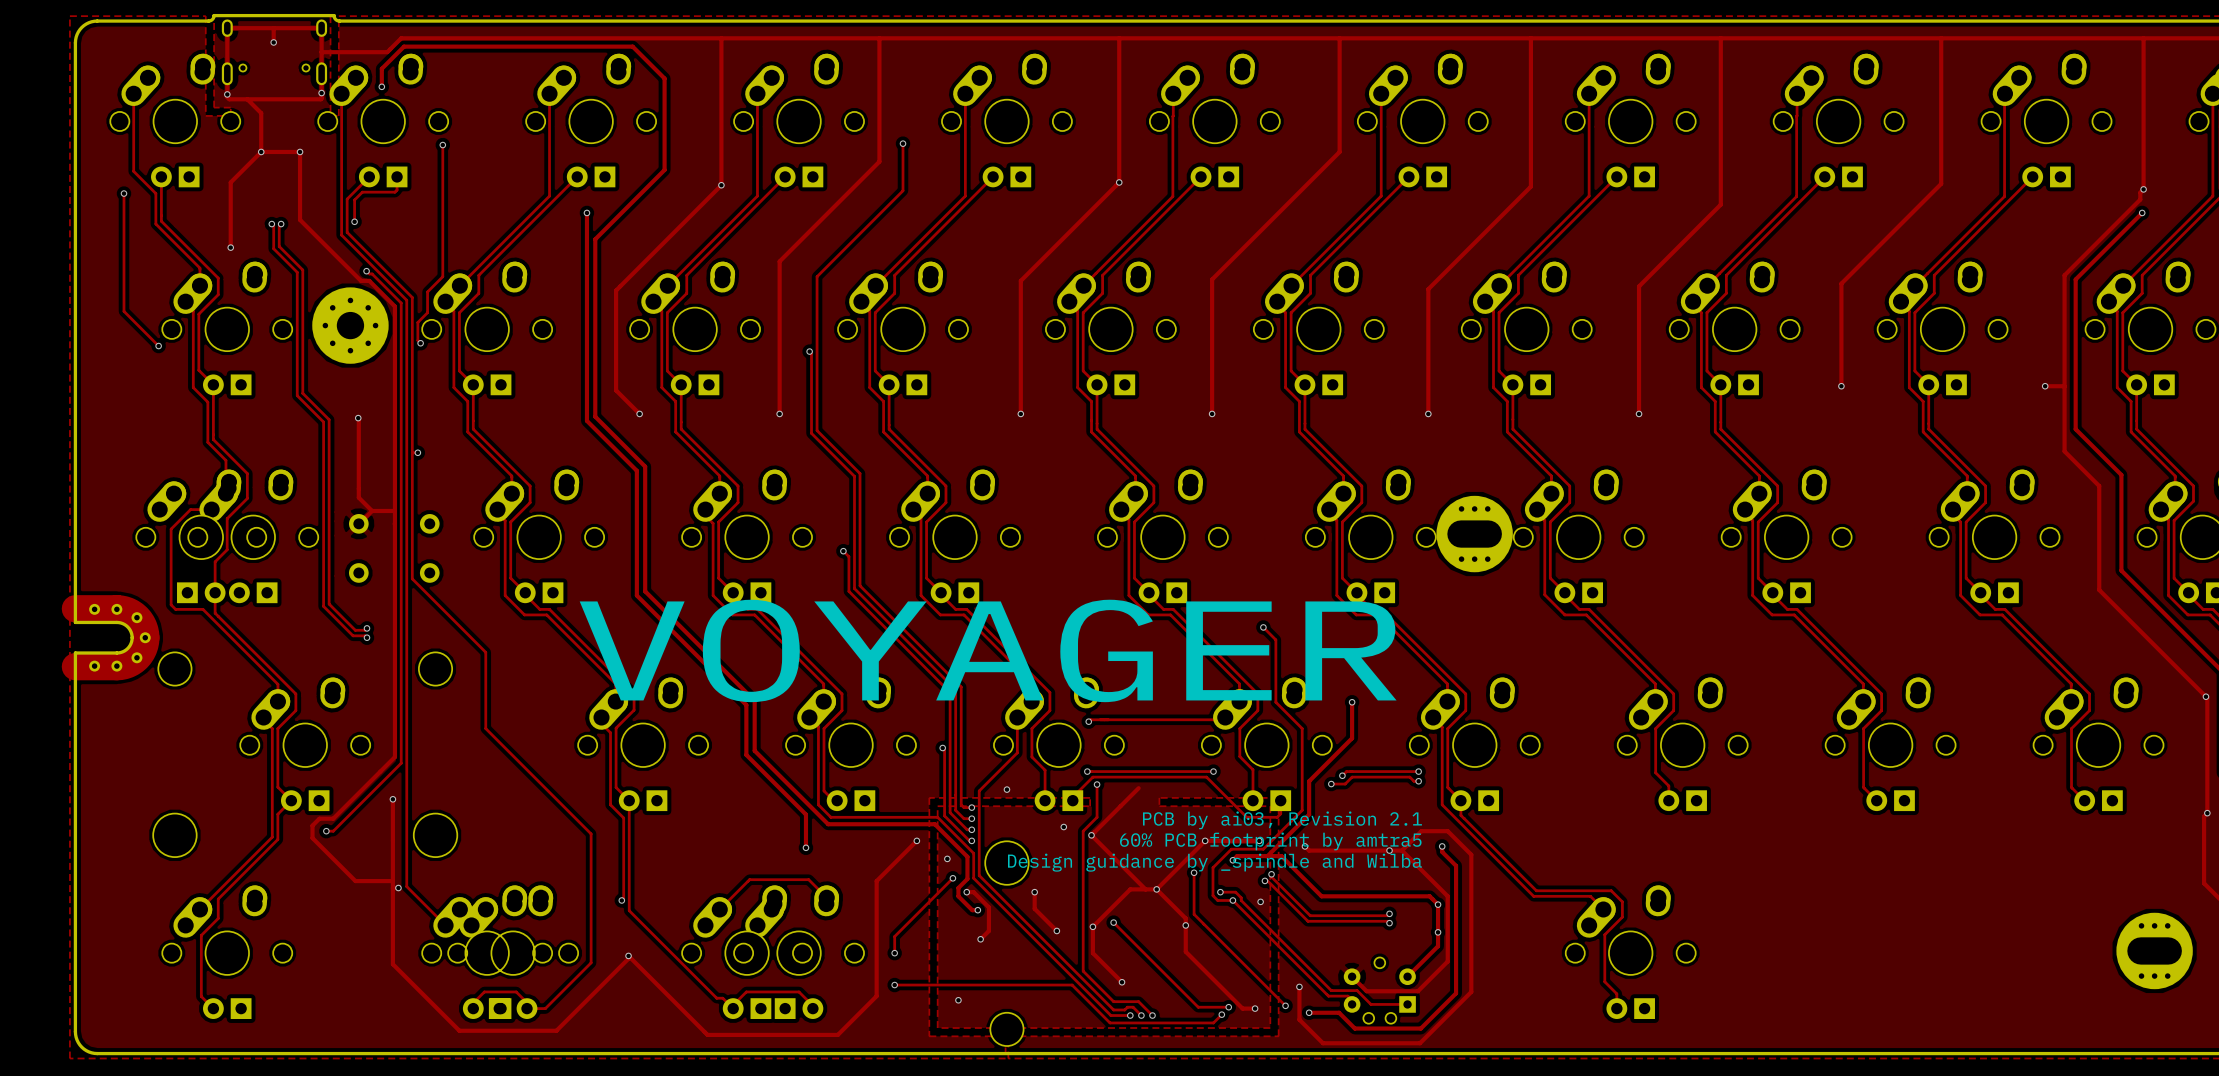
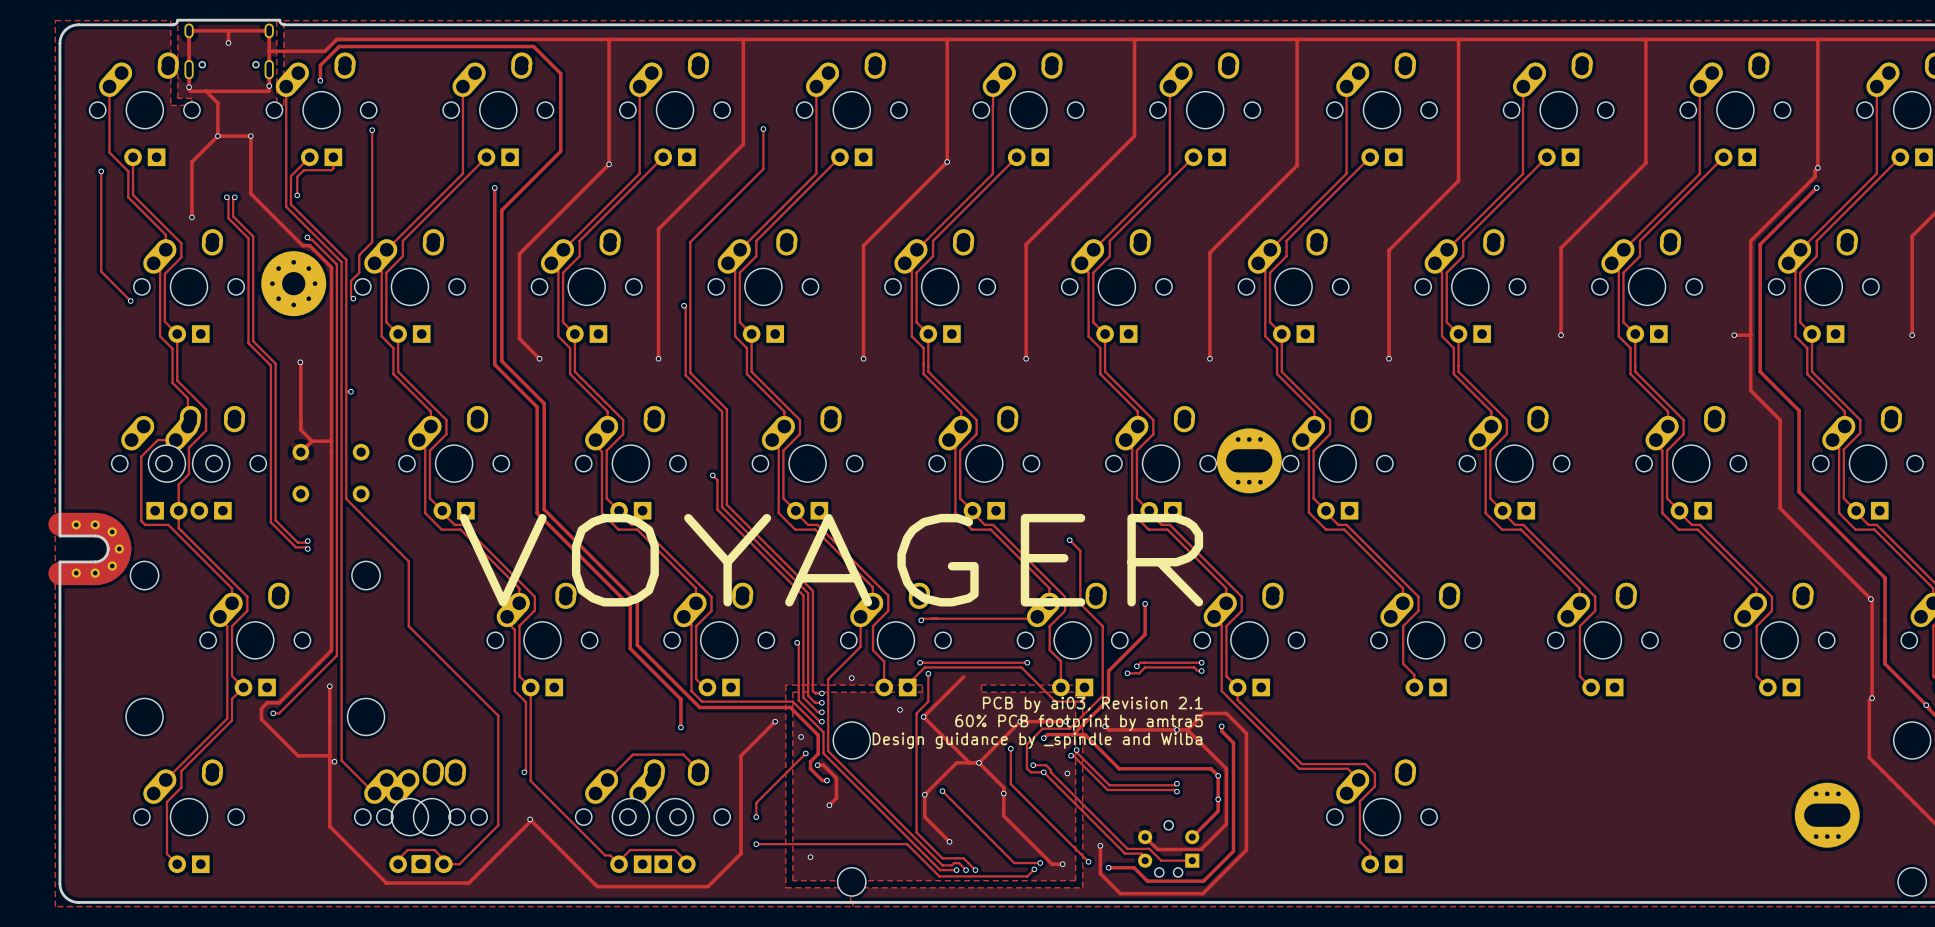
track: (1034, 892) (1034, 908) (1056, 930) -> none
via: (1034, 892) -> none
via: (1056, 930) -> none

